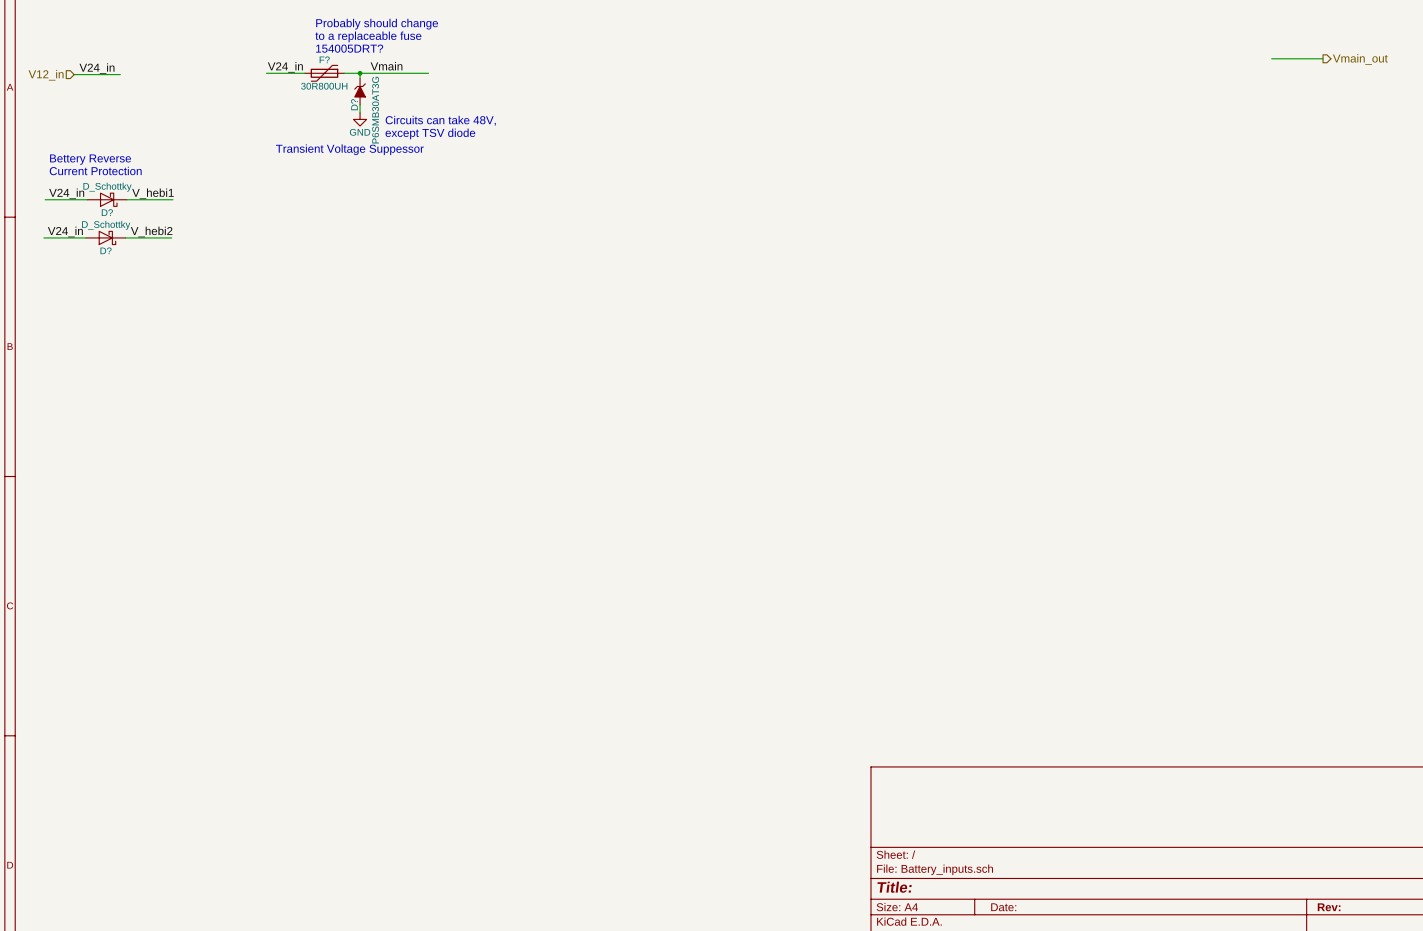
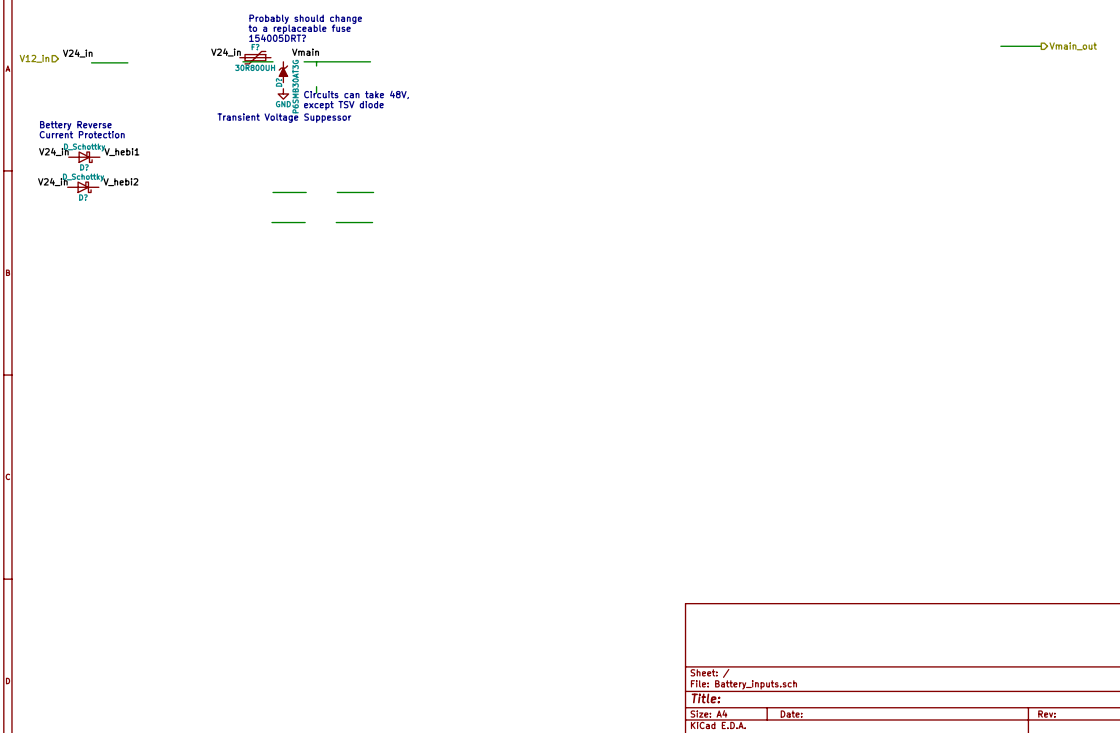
wire: (266, 73) (304, 73) -> (242, 61) (273, 61)
wire: (344, 73) (428, 73) -> (304, 61) (370, 61)
wire: (360, 73) (360, 78) -> (316, 61) (316, 65)
junction: (360, 73) -> none
wire: (74, 74) (120, 74) -> (91, 62) (127, 62)
wire: (360, 104) (360, 112) -> (316, 86) (316, 92)
wire: (45, 199) (87, 199) -> none
wire: (126, 199) (172, 199) -> none
wire: (43, 237) (86, 237) -> none
wire: (125, 237) (171, 237) -> none
wire: none -> (273, 192) (306, 192)
wire: none -> (337, 192) (373, 192)
wire: none -> (271, 222) (305, 222)
wire: none -> (336, 222) (372, 222)

